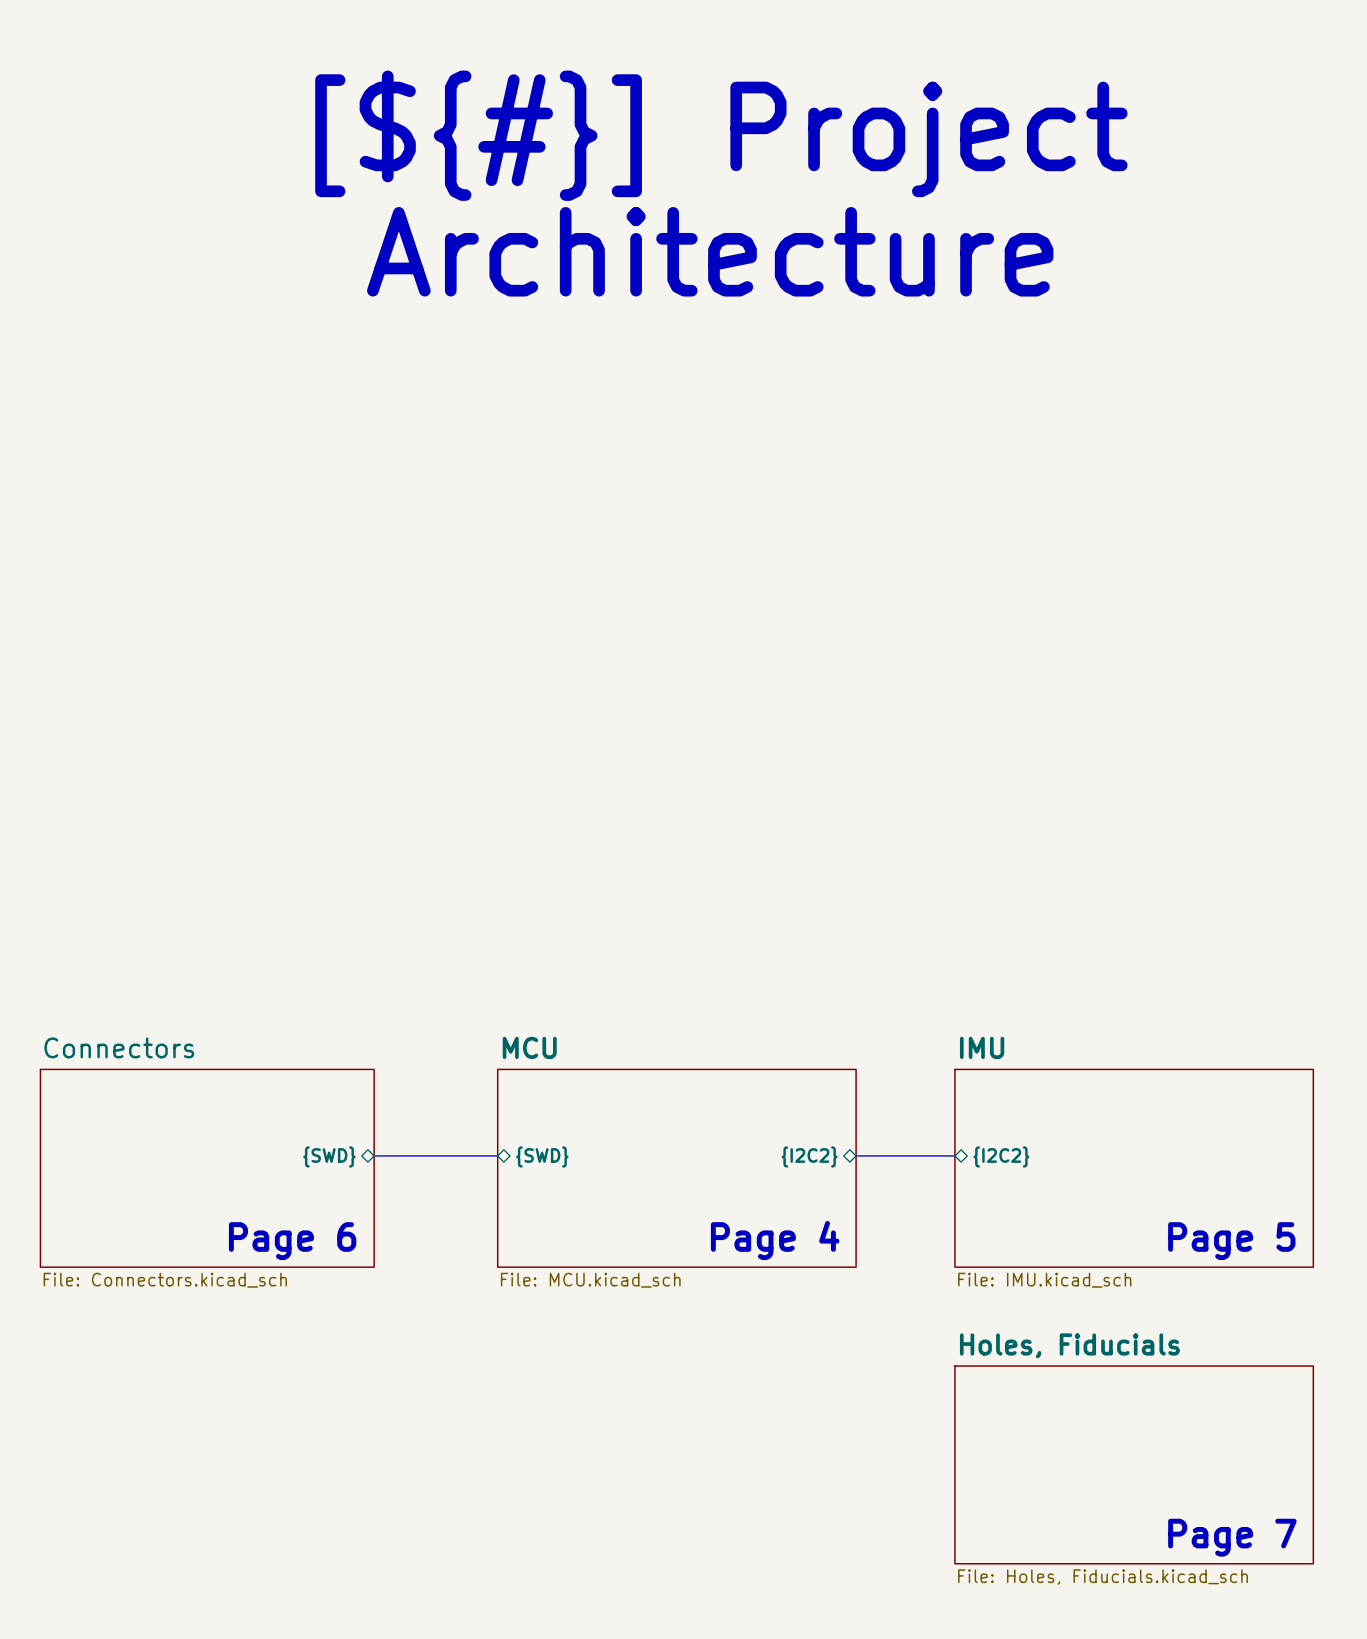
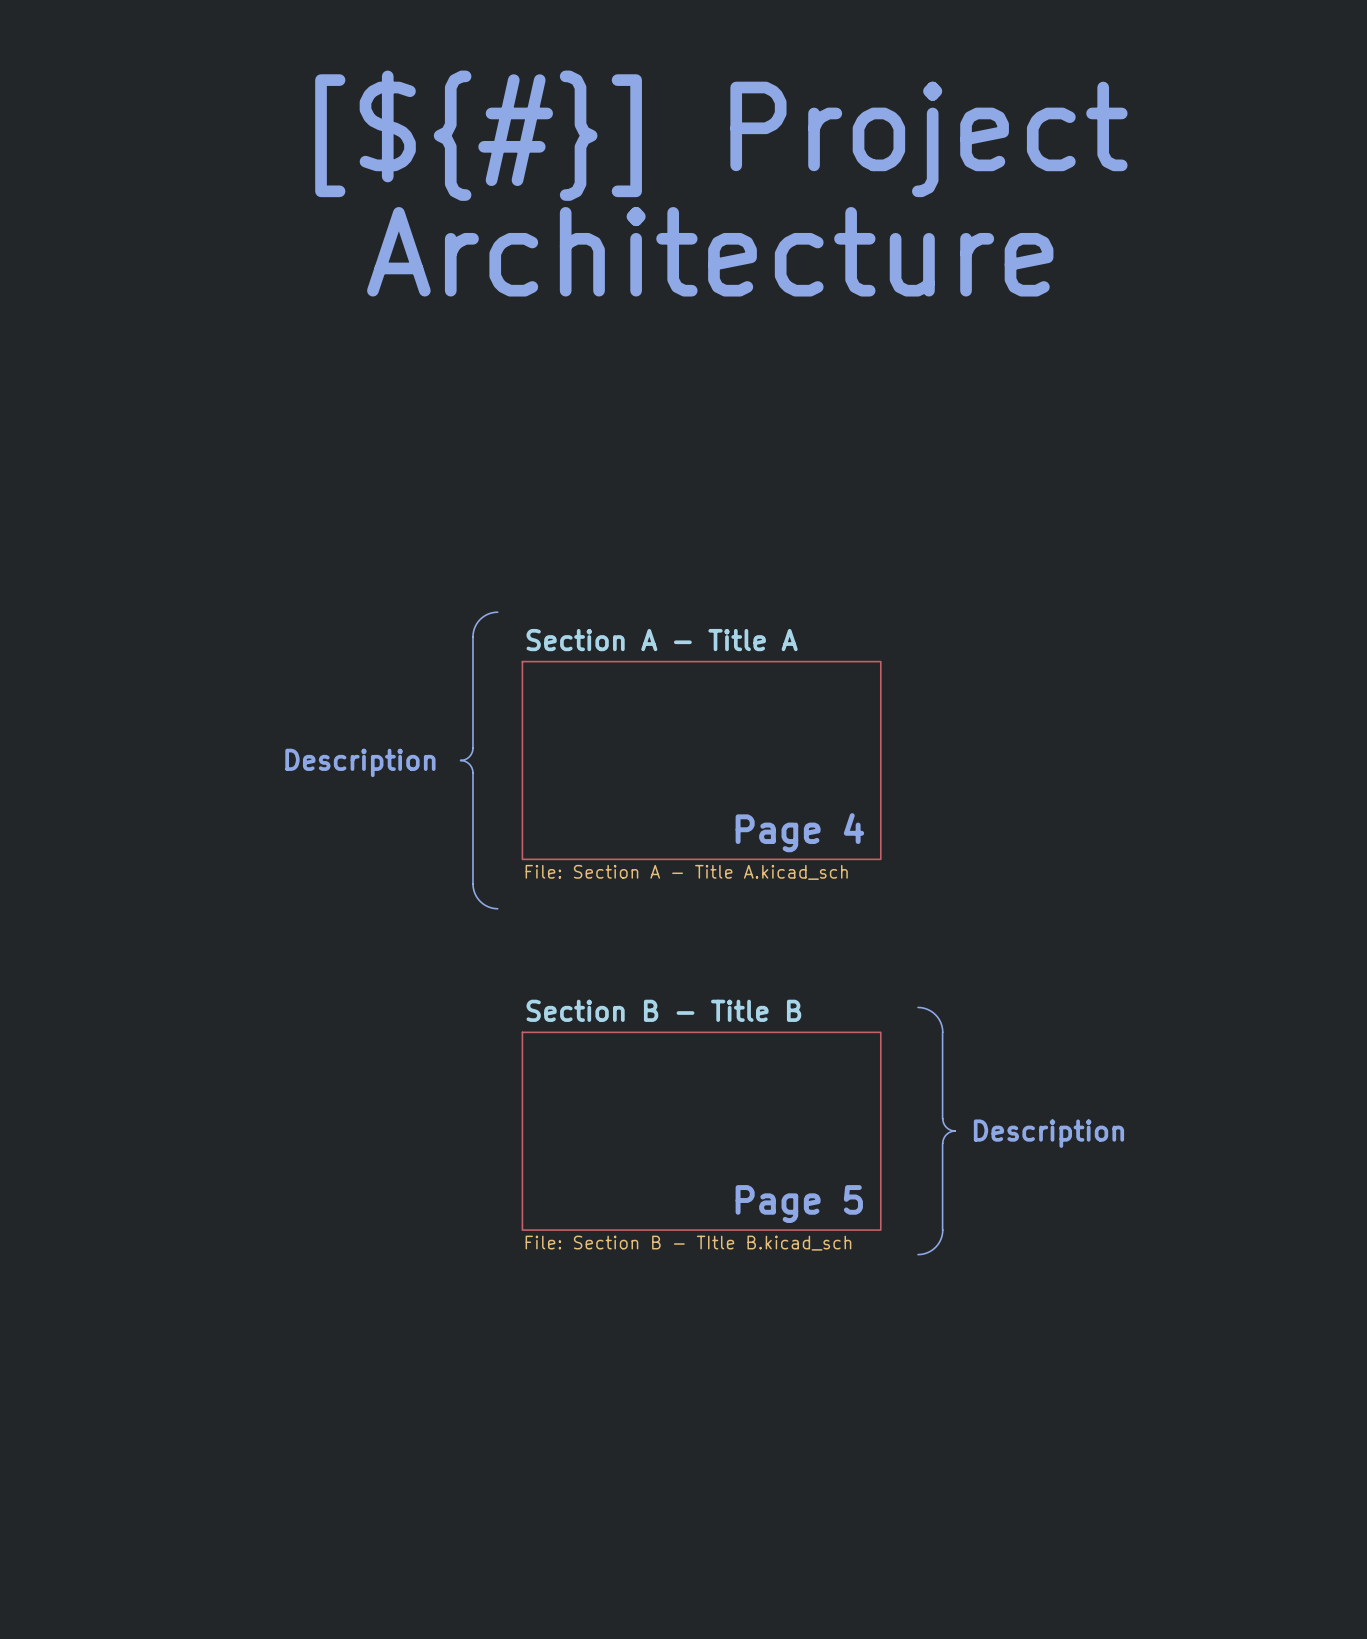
line: none -> (497, 612) (482, 617) (473, 631) (472, 749) (468, 757) (460, 760) (468, 763) (472, 771) (473, 890) (482, 903) (497, 908)
sheet Section A - Title A: none -> File: Section A - Title A.kicad_sch (701, 760)
text: none -> Description (360, 762)
text: none -> Page 4 (799, 832)
line: none -> (918, 1007) (927, 1009) (935, 1014) (940, 1022) (942, 1032)
line: none -> (942, 1032) (942, 1118)
line: none -> (942, 1118) (946, 1127) (955, 1131) (946, 1134) (942, 1143)
sheet Section B - Title B: none -> File: Section B - TItle B.kicad_sch (701, 1131)
text: none -> Description (1048, 1133)
line: none -> (942, 1143) (942, 1230)
bus: (374, 1155) (497, 1155) -> none
bus: (856, 1155) (954, 1155) -> none
sheet pin: {SWD} (329, 1156) -> none
sheet pin: {SWD} (542, 1156) -> none
sheet pin: {I2C2} (809, 1156) -> none
sheet pin: {I2C2} (1001, 1156) -> none
sheet Connectors: File: Connectors.kicad_sch (207, 1168) -> none
sheet MCU: File: MCU.kicad_sch (676, 1168) -> none
sheet IMU: File: IMU.kicad_sch (1134, 1168) -> none
line: none -> (942, 1229) (941, 1238) (935, 1247) (926, 1253) (918, 1254)
text: Page 4 (775, 1240) -> Page 5 (799, 1204)
text: Page 6 (292, 1241) -> none
text: Page 5 (1231, 1241) -> none
sheet Holes, Fiducials: File: Holes, Fiducials.kicad_sch (1134, 1464) -> none
text: Page 7 (1232, 1537) -> none

